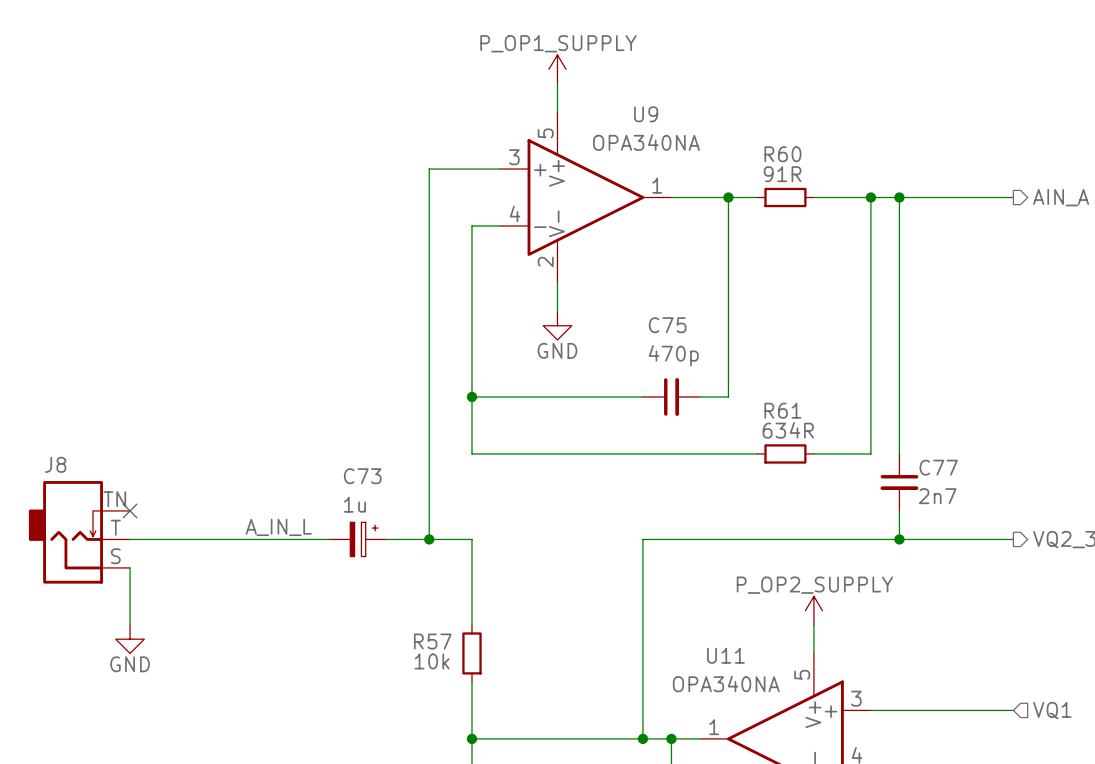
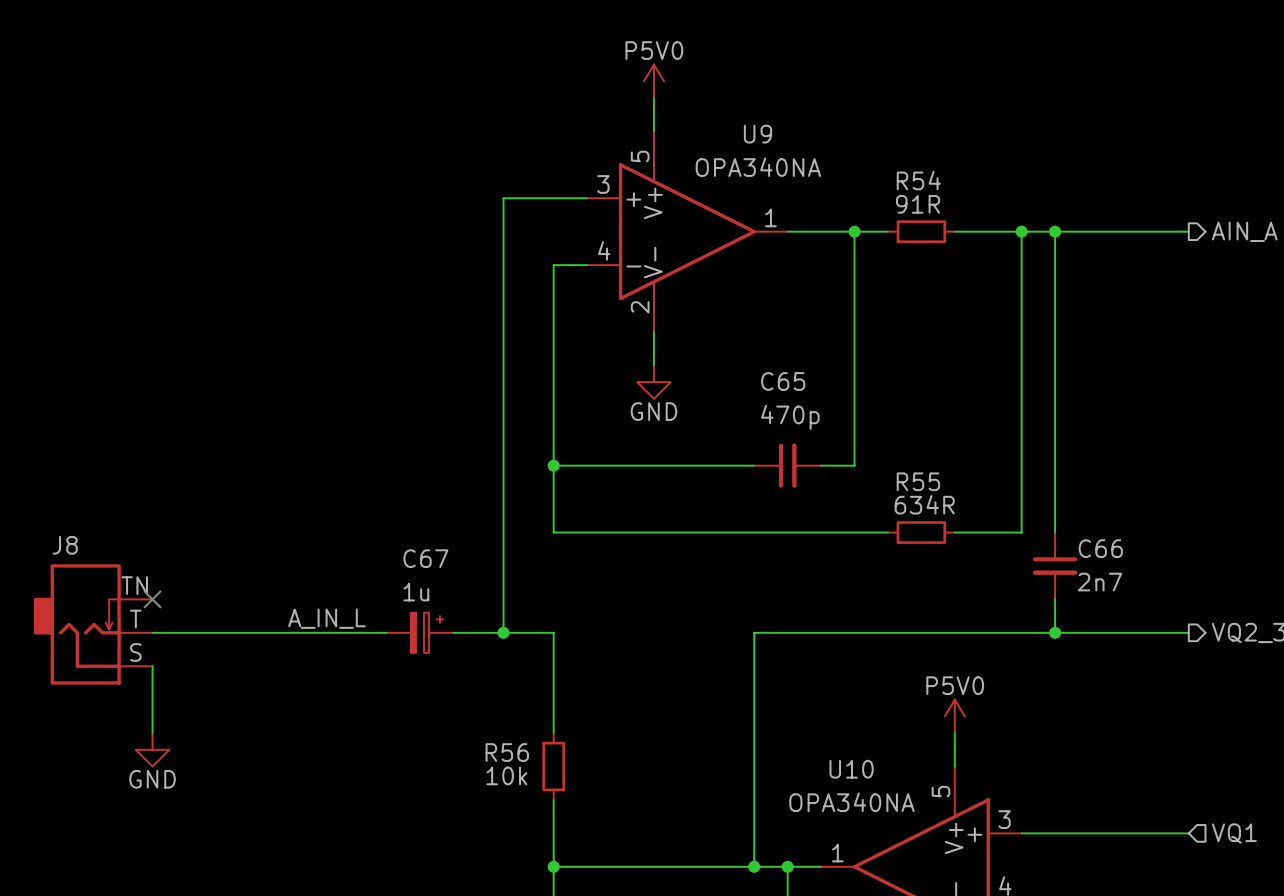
power symbol: P_OP1_SUPPLY (557, 69) -> P5V0 (653, 81)
R60 name: R60 (782, 154) -> R54 (918, 180)
C75 name: C75 (667, 325) -> C65 (783, 381)
R61 name: R61 (782, 410) -> R55 (918, 481)
C77 name: C77 (938, 467) -> C66 (1100, 548)
C73 name: C73 (362, 476) -> C67 (425, 558)
power symbol: P_OP2_SUPPLY (813, 610) -> P5V0 (954, 716)
R57 name: R57 (432, 641) -> R56 (507, 752)
U11 name: U11 (725, 655) -> U10 (851, 769)

